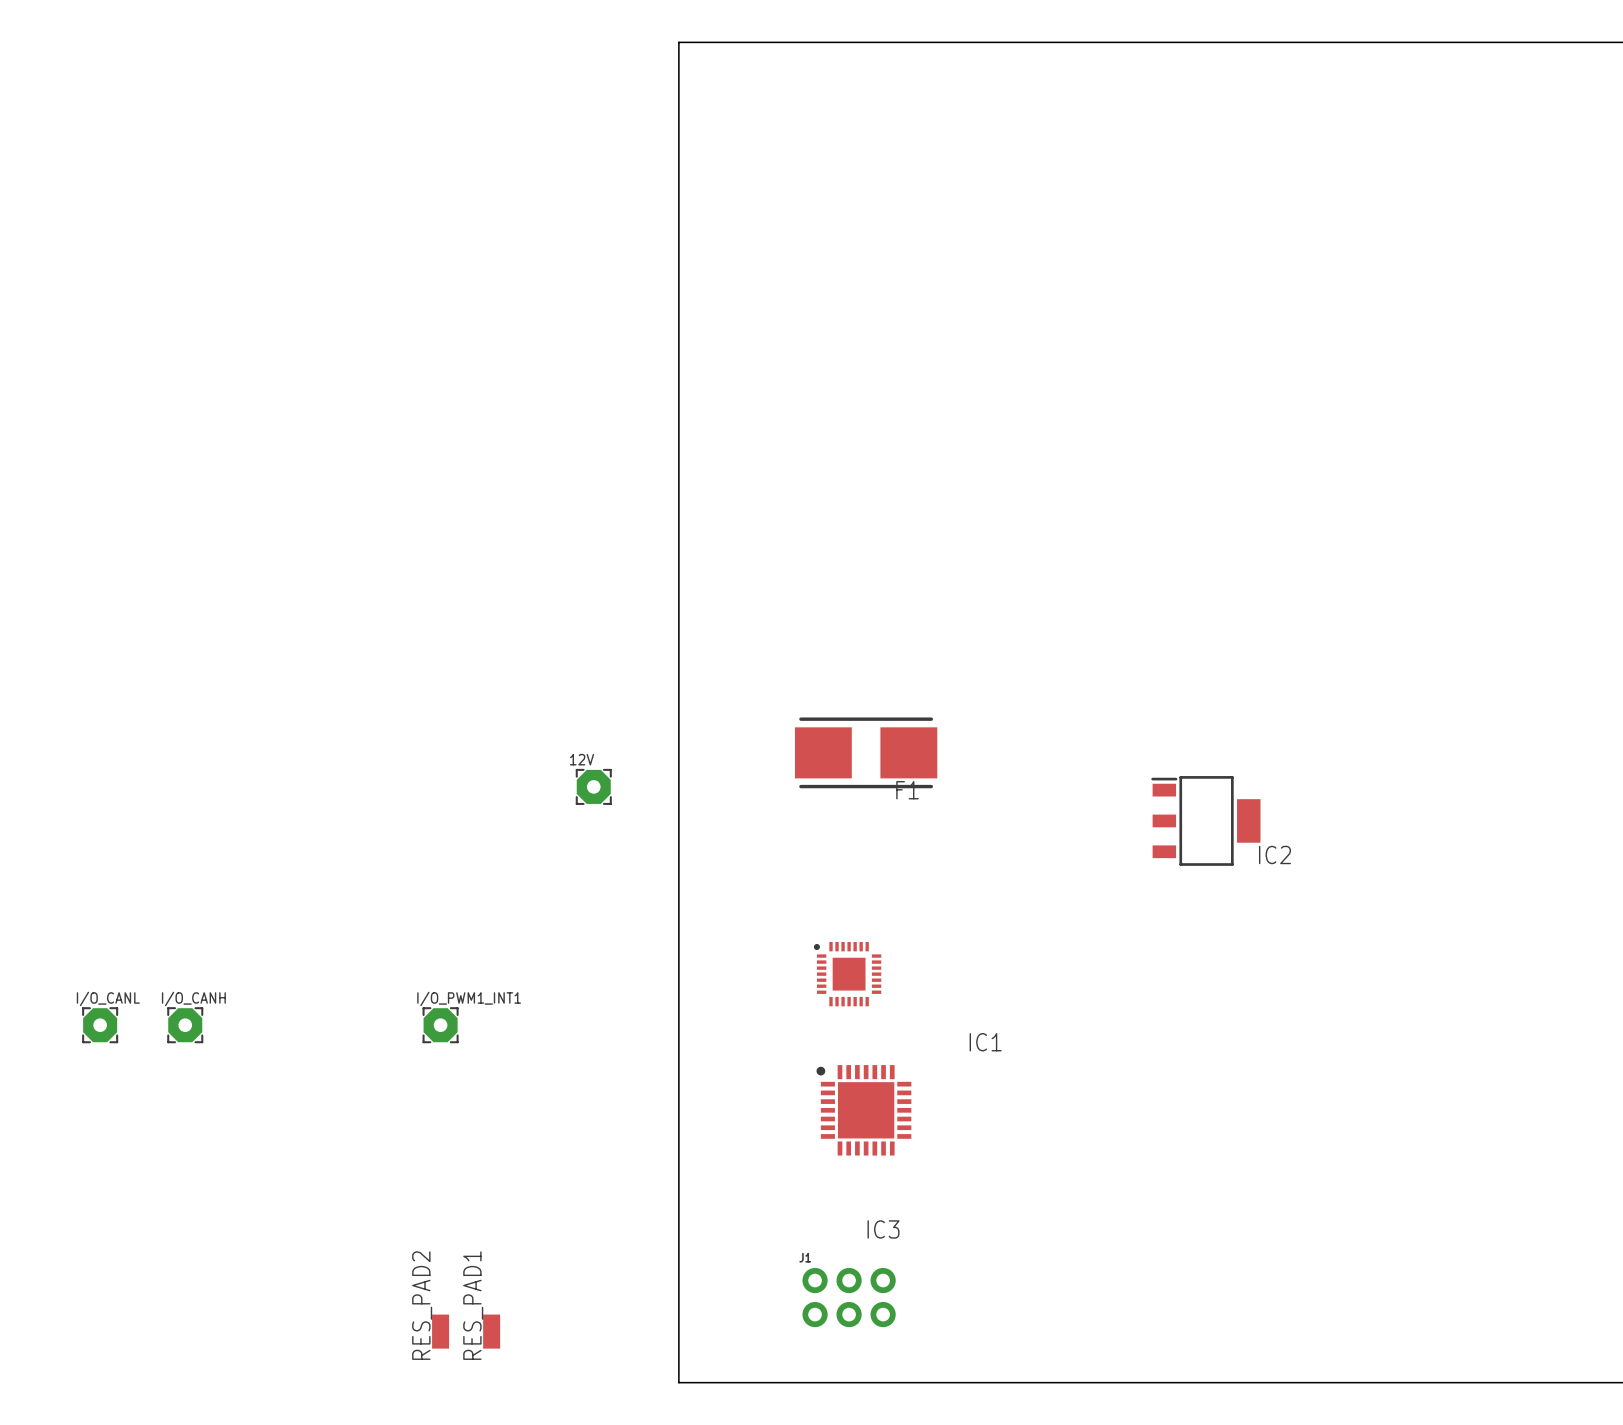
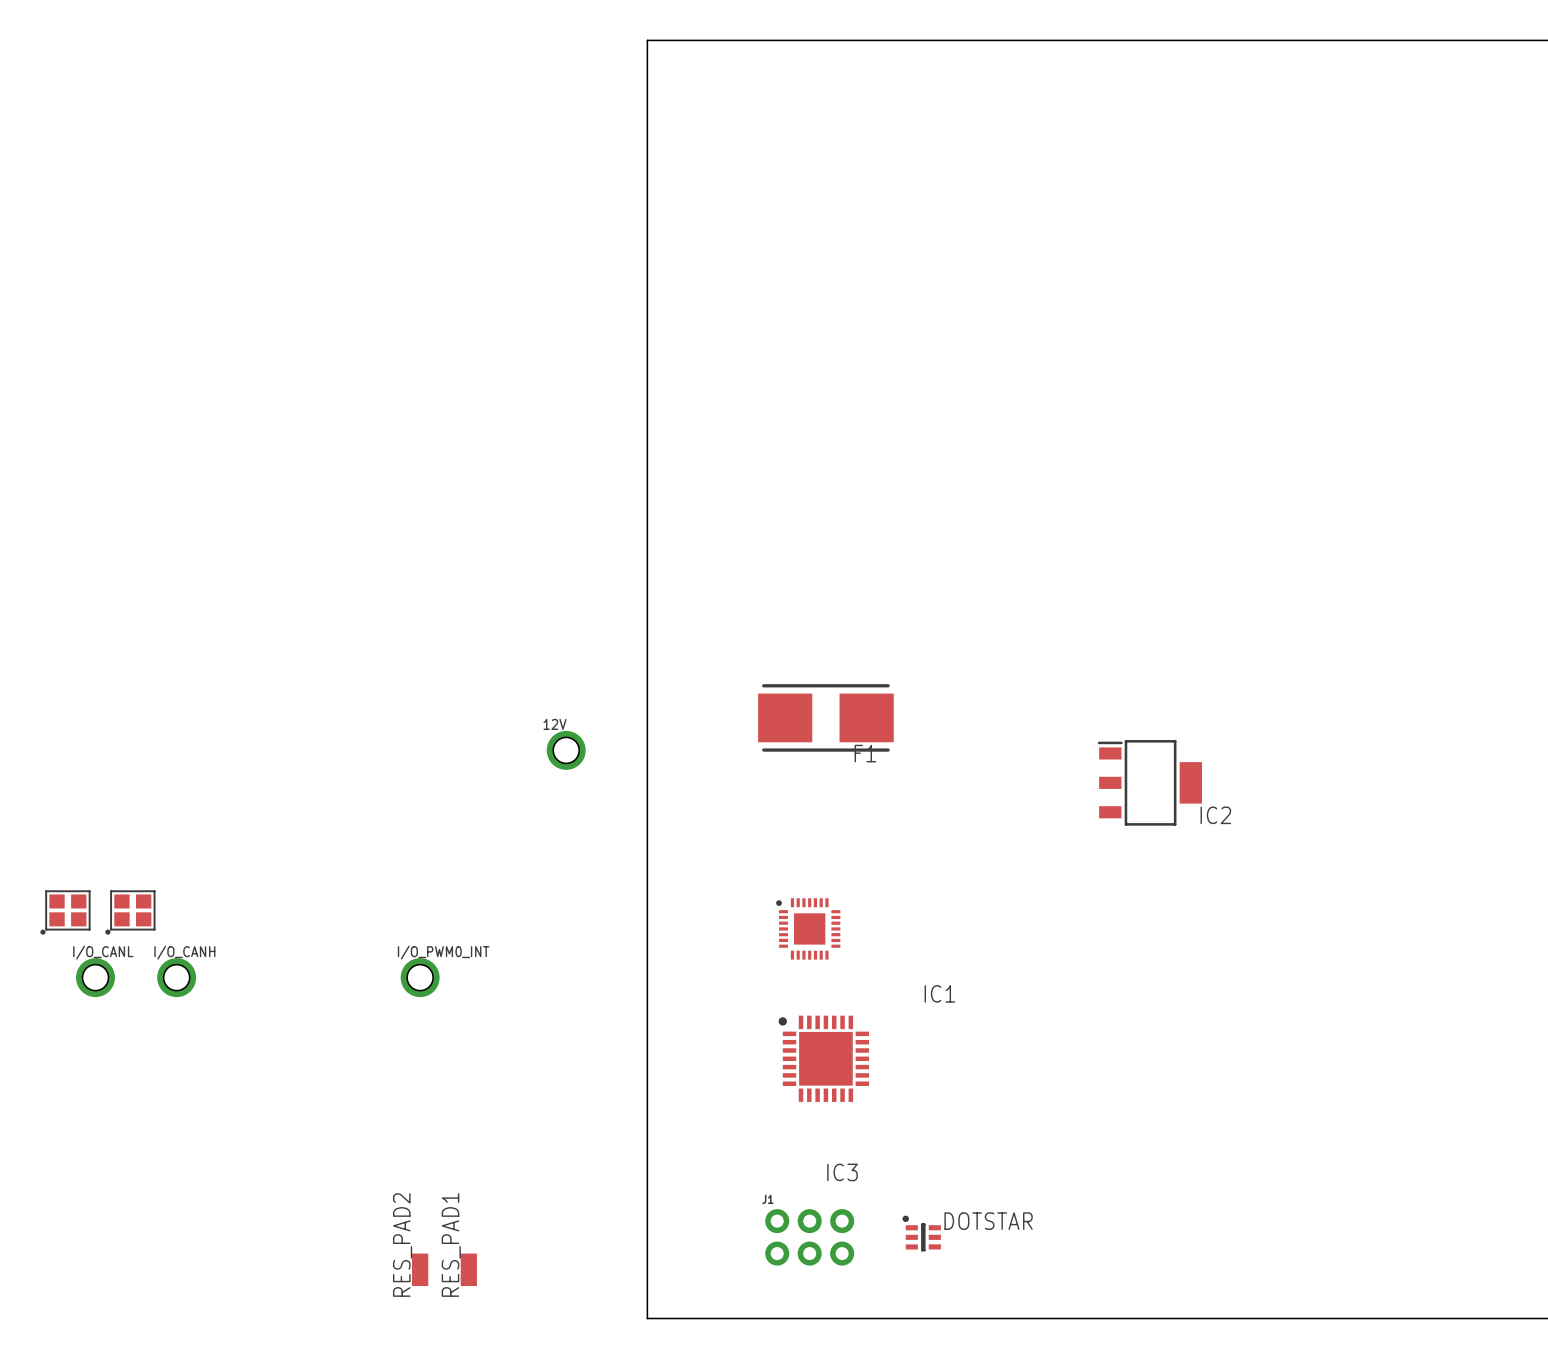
12V footprint: [575, 768, 612, 805] -> [546, 730, 586, 770]
part: none -> (65, 912)
part: none -> (130, 912)
I/O_CANL footprint: [82, 1007, 119, 1044] -> [76, 958, 115, 998]
I/O_CANH footprint: [167, 1007, 204, 1044] -> [157, 958, 197, 998]
I/O_PWM1_INT1: (440, 1025) -> none
I/O_PWM0_INT: none -> (420, 977)
DOTSTAR: none -> (921, 1233)

